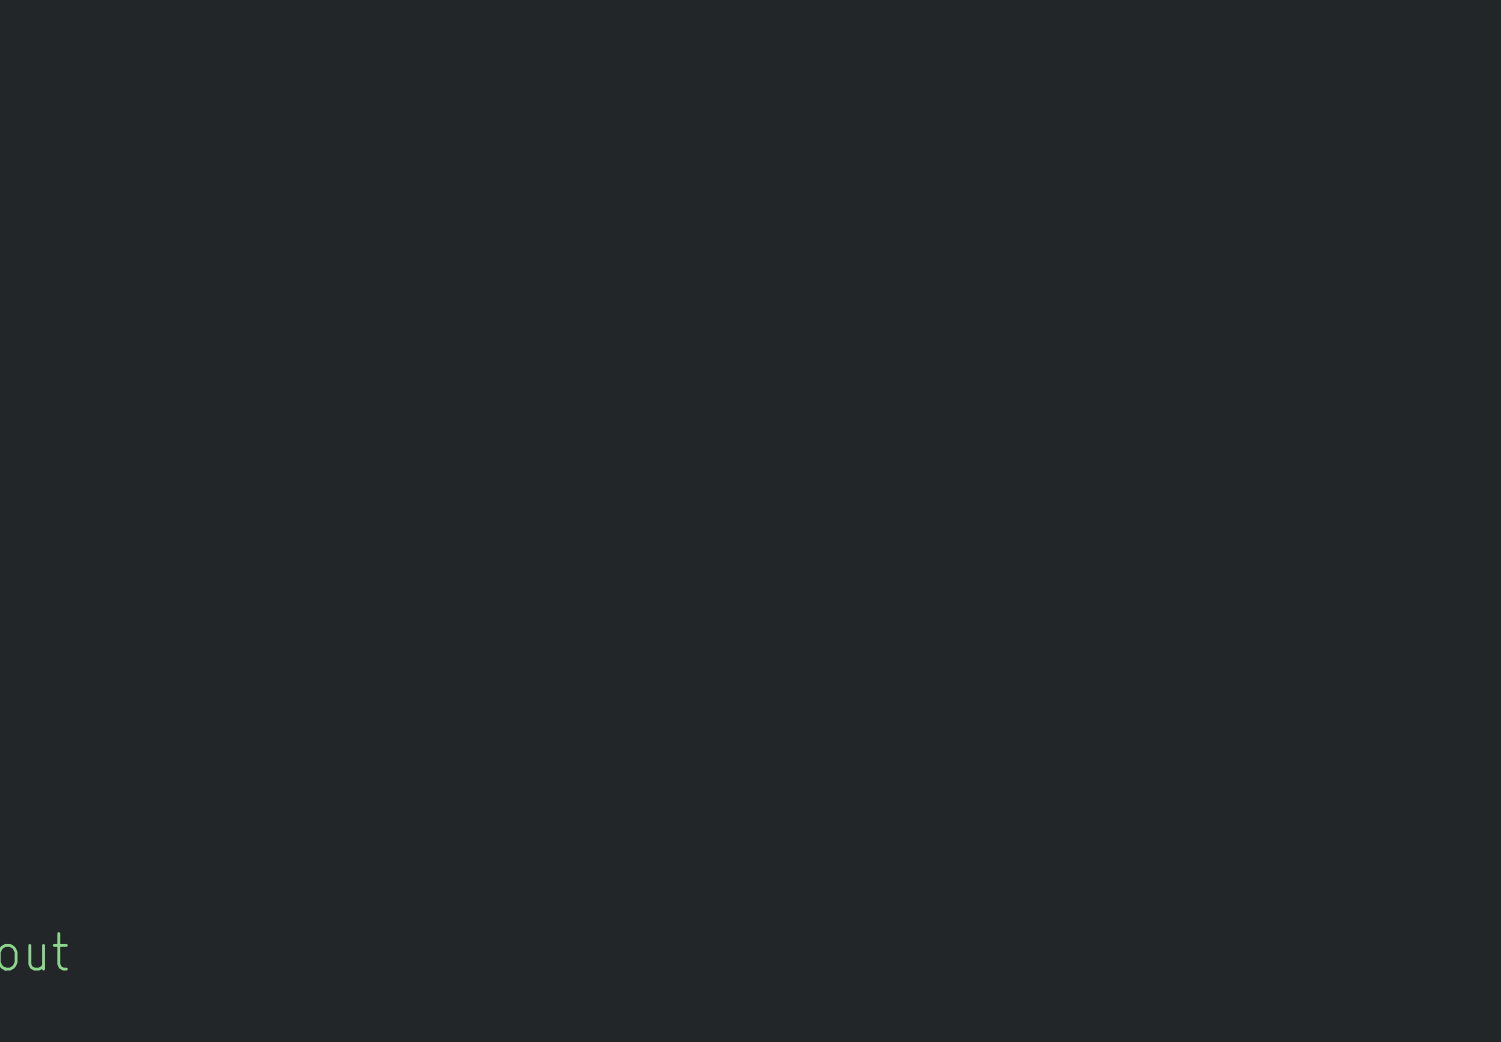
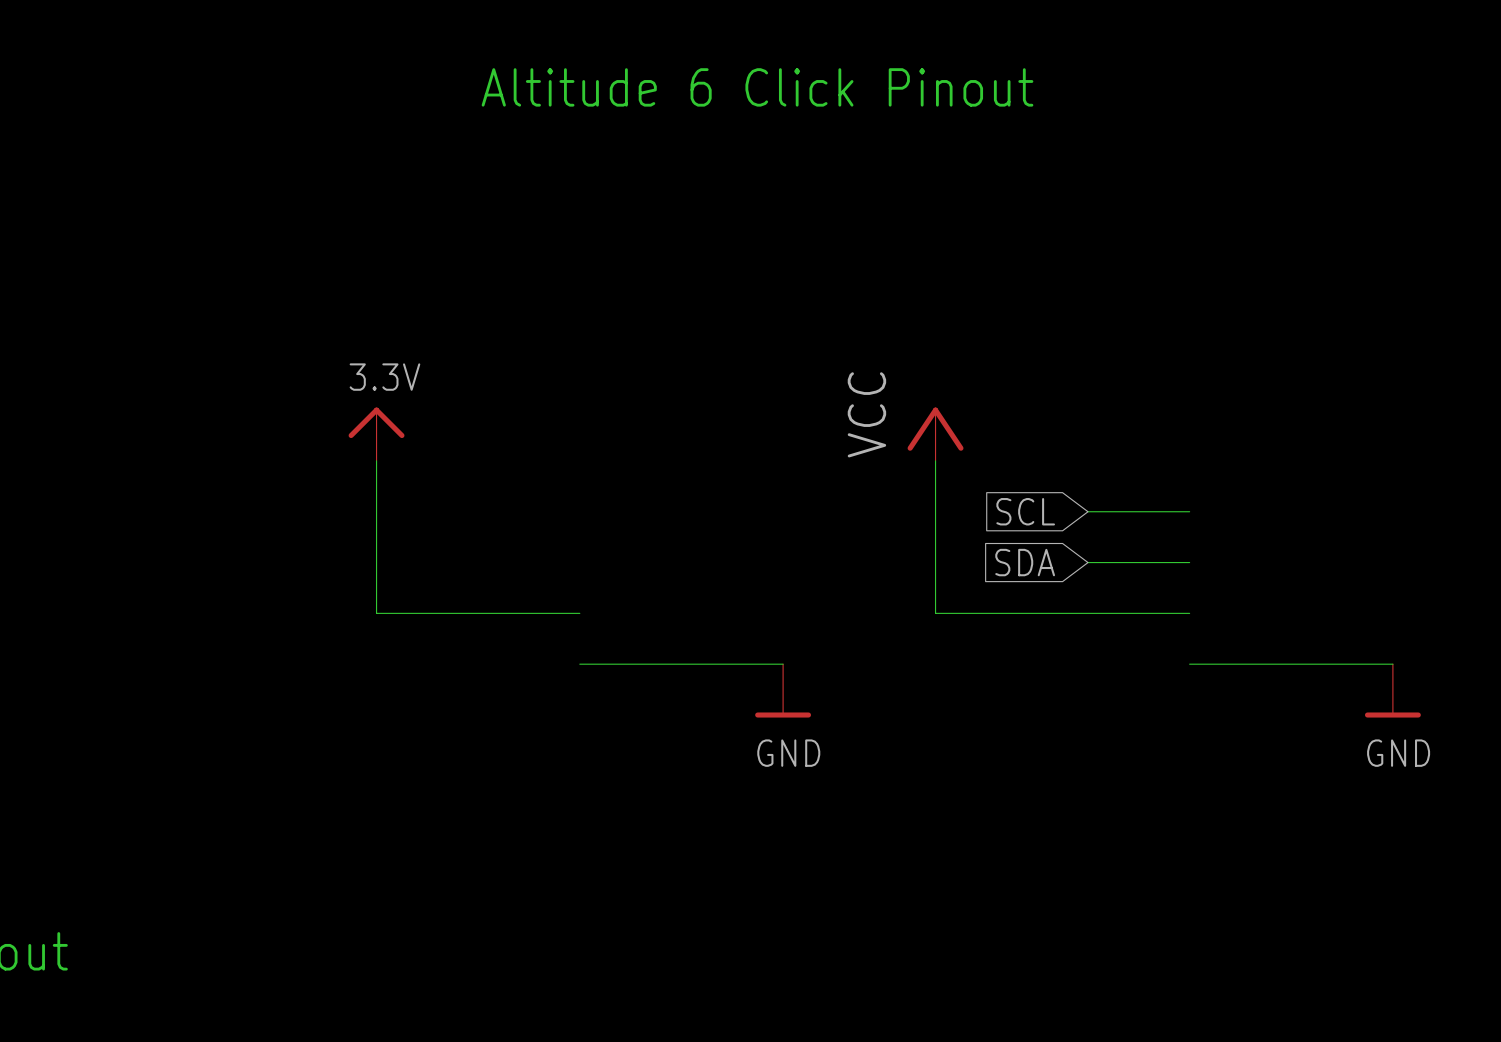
text: none -> Altitude 6 Click Pinout (757, 87)
power symbol: none -> 3.3V (376, 434)
power symbol: none -> VCC (935, 434)
wire: none -> (376, 460) (376, 613) (579, 613)
wire: none -> (935, 460) (935, 613) (1189, 613)
global label: none -> SCL (1025, 511)
wire: none -> (1087, 511) (1189, 511)
global label: none -> SDA (1025, 562)
wire: none -> (1087, 562) (1189, 562)
wire: none -> (579, 664) (783, 664)
wire: none -> (1189, 664) (1392, 664)
power symbol: none -> GND (783, 690)
power symbol: none -> GND (1392, 690)

